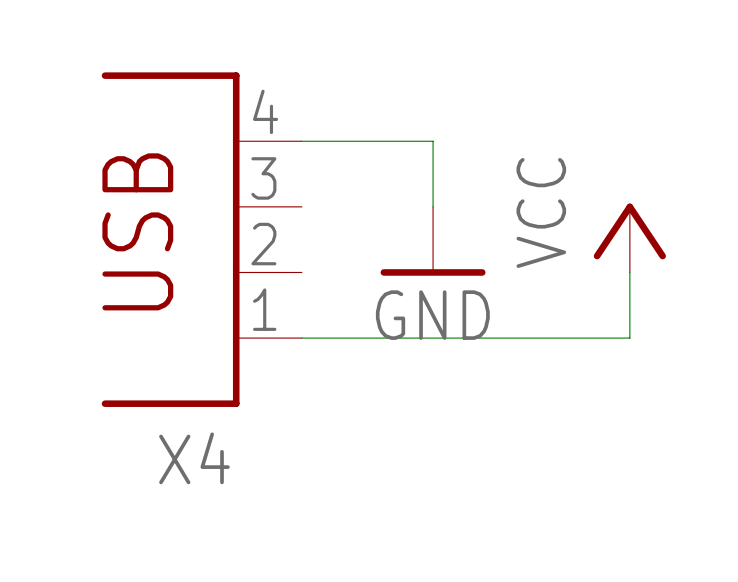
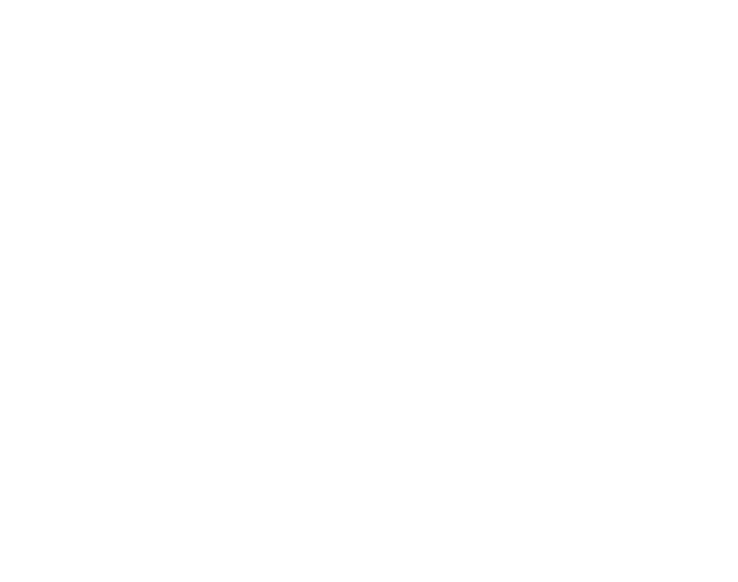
wire: (301, 141) (433, 141) (433, 206) -> none
power symbol: VCC (629, 238) -> none
X4: (201, 239) -> none
power symbol: GND (433, 241) -> none
wire: (629, 272) (629, 338) (301, 338) -> none

